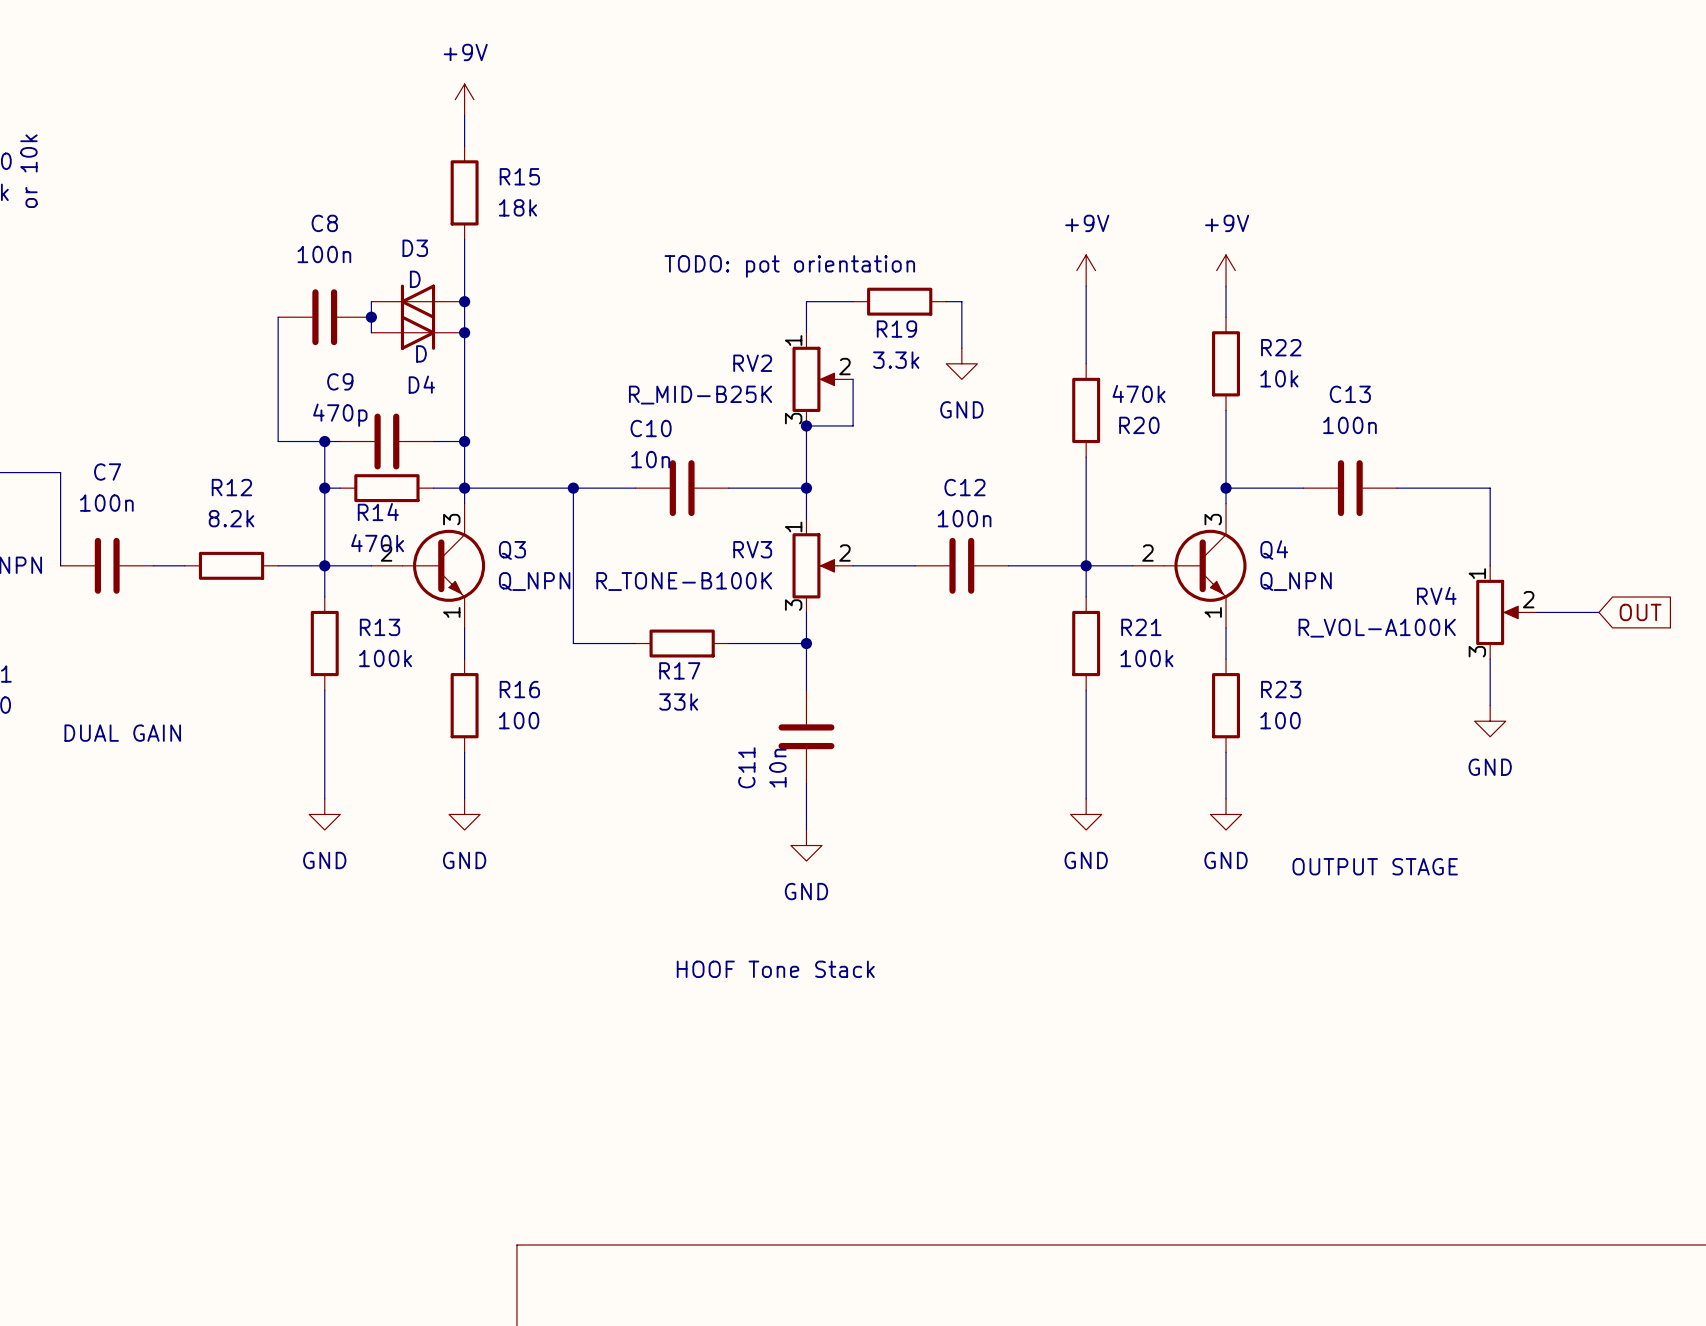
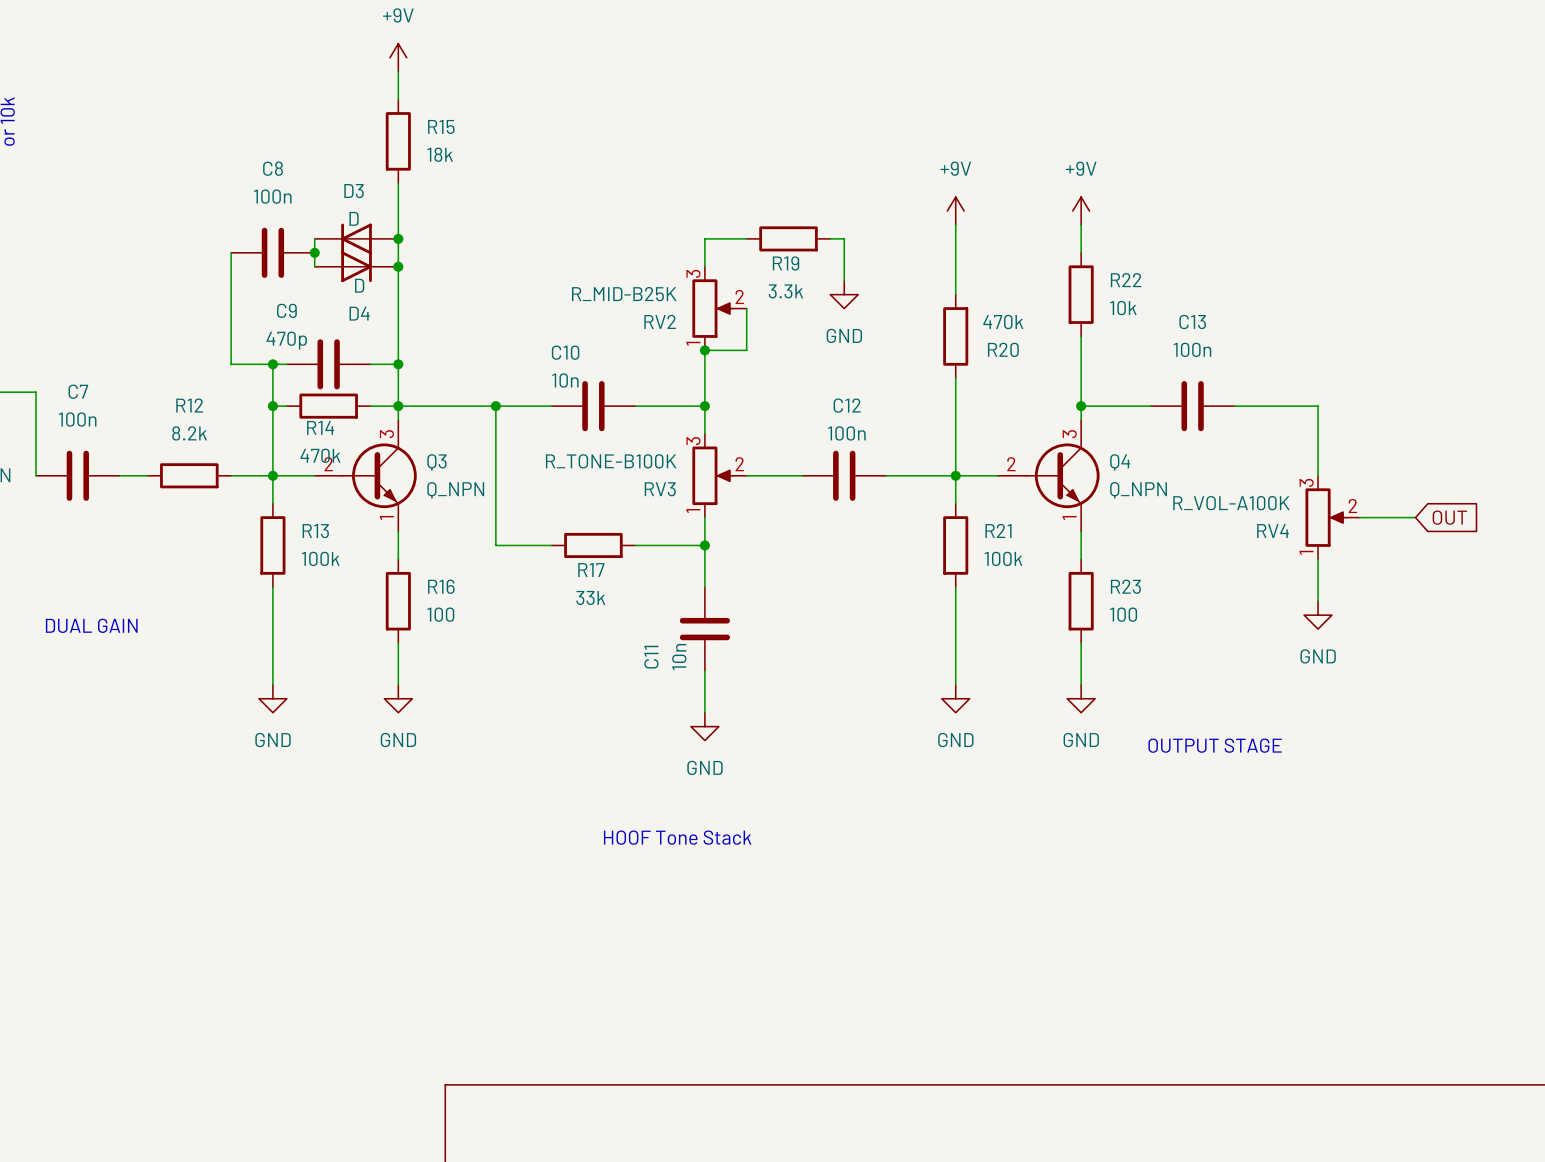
text: TODO: pot orientation (789, 266) -> none
RV2 flip: as is (815, 379) -> up-down (712, 308)
RV3 flip: as is (815, 565) -> up-down (712, 475)
RV4 flip: as is (1498, 612) -> up-down (1325, 517)

